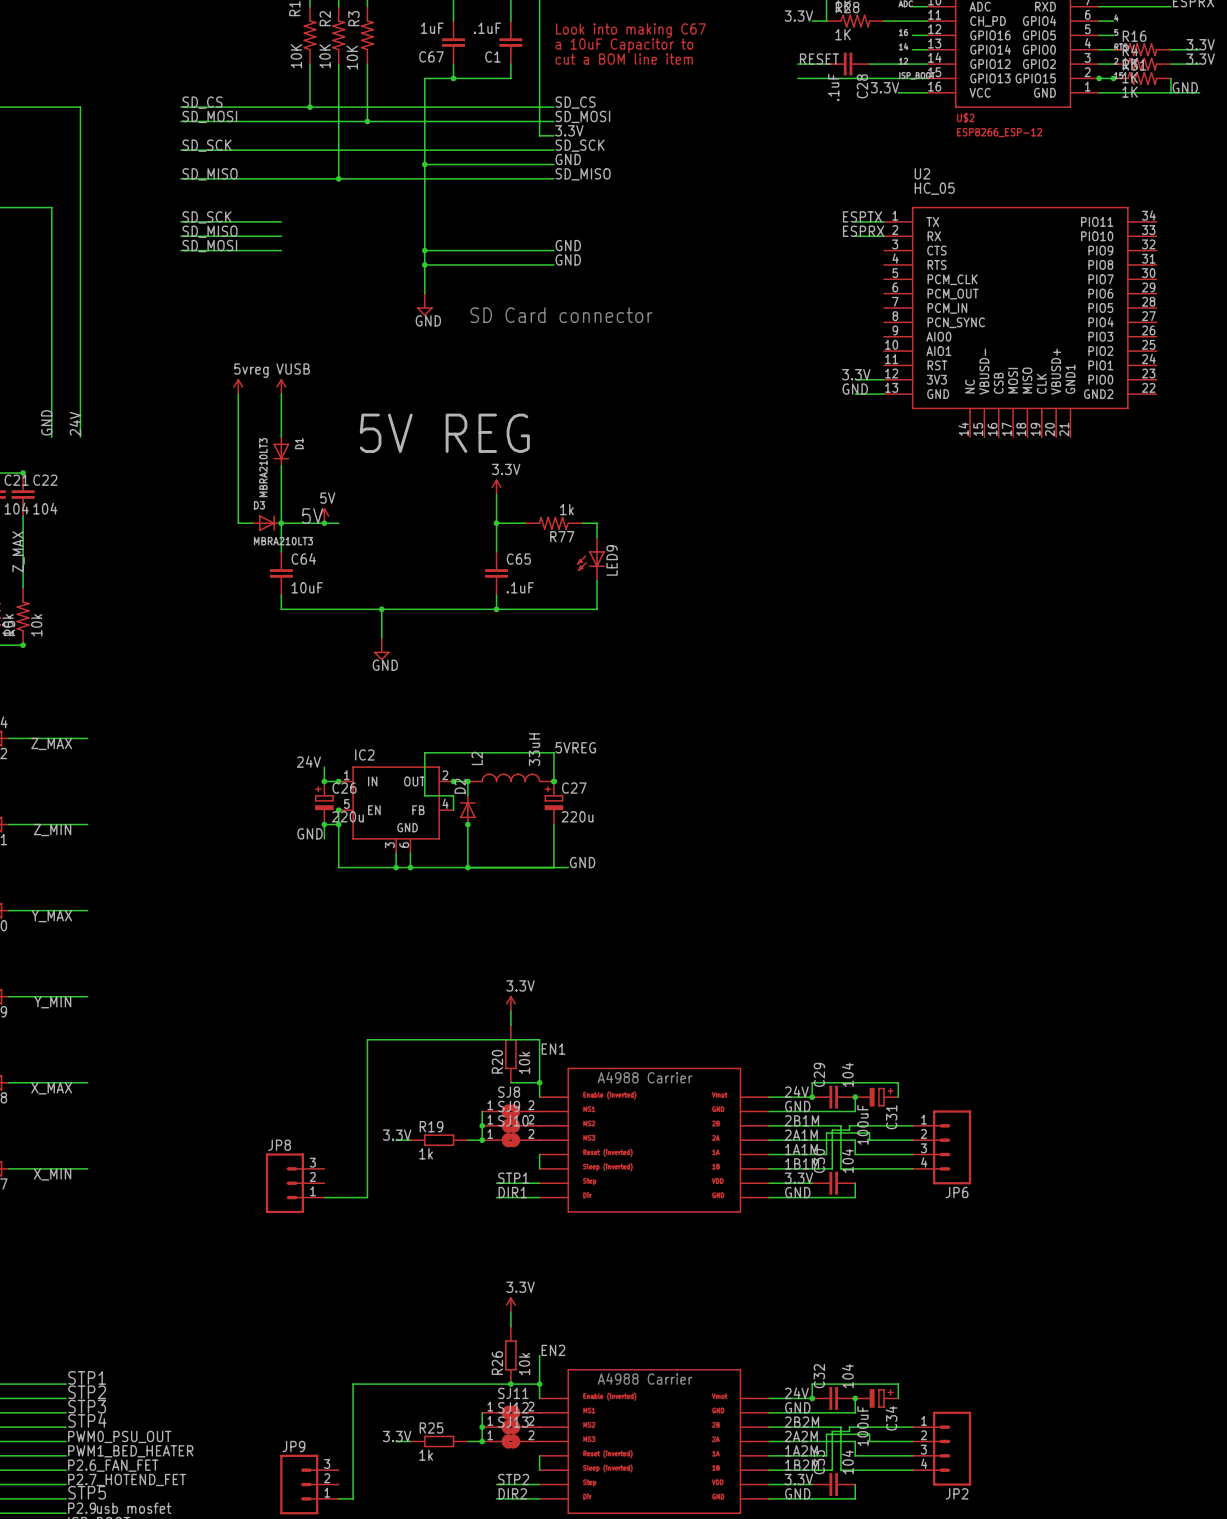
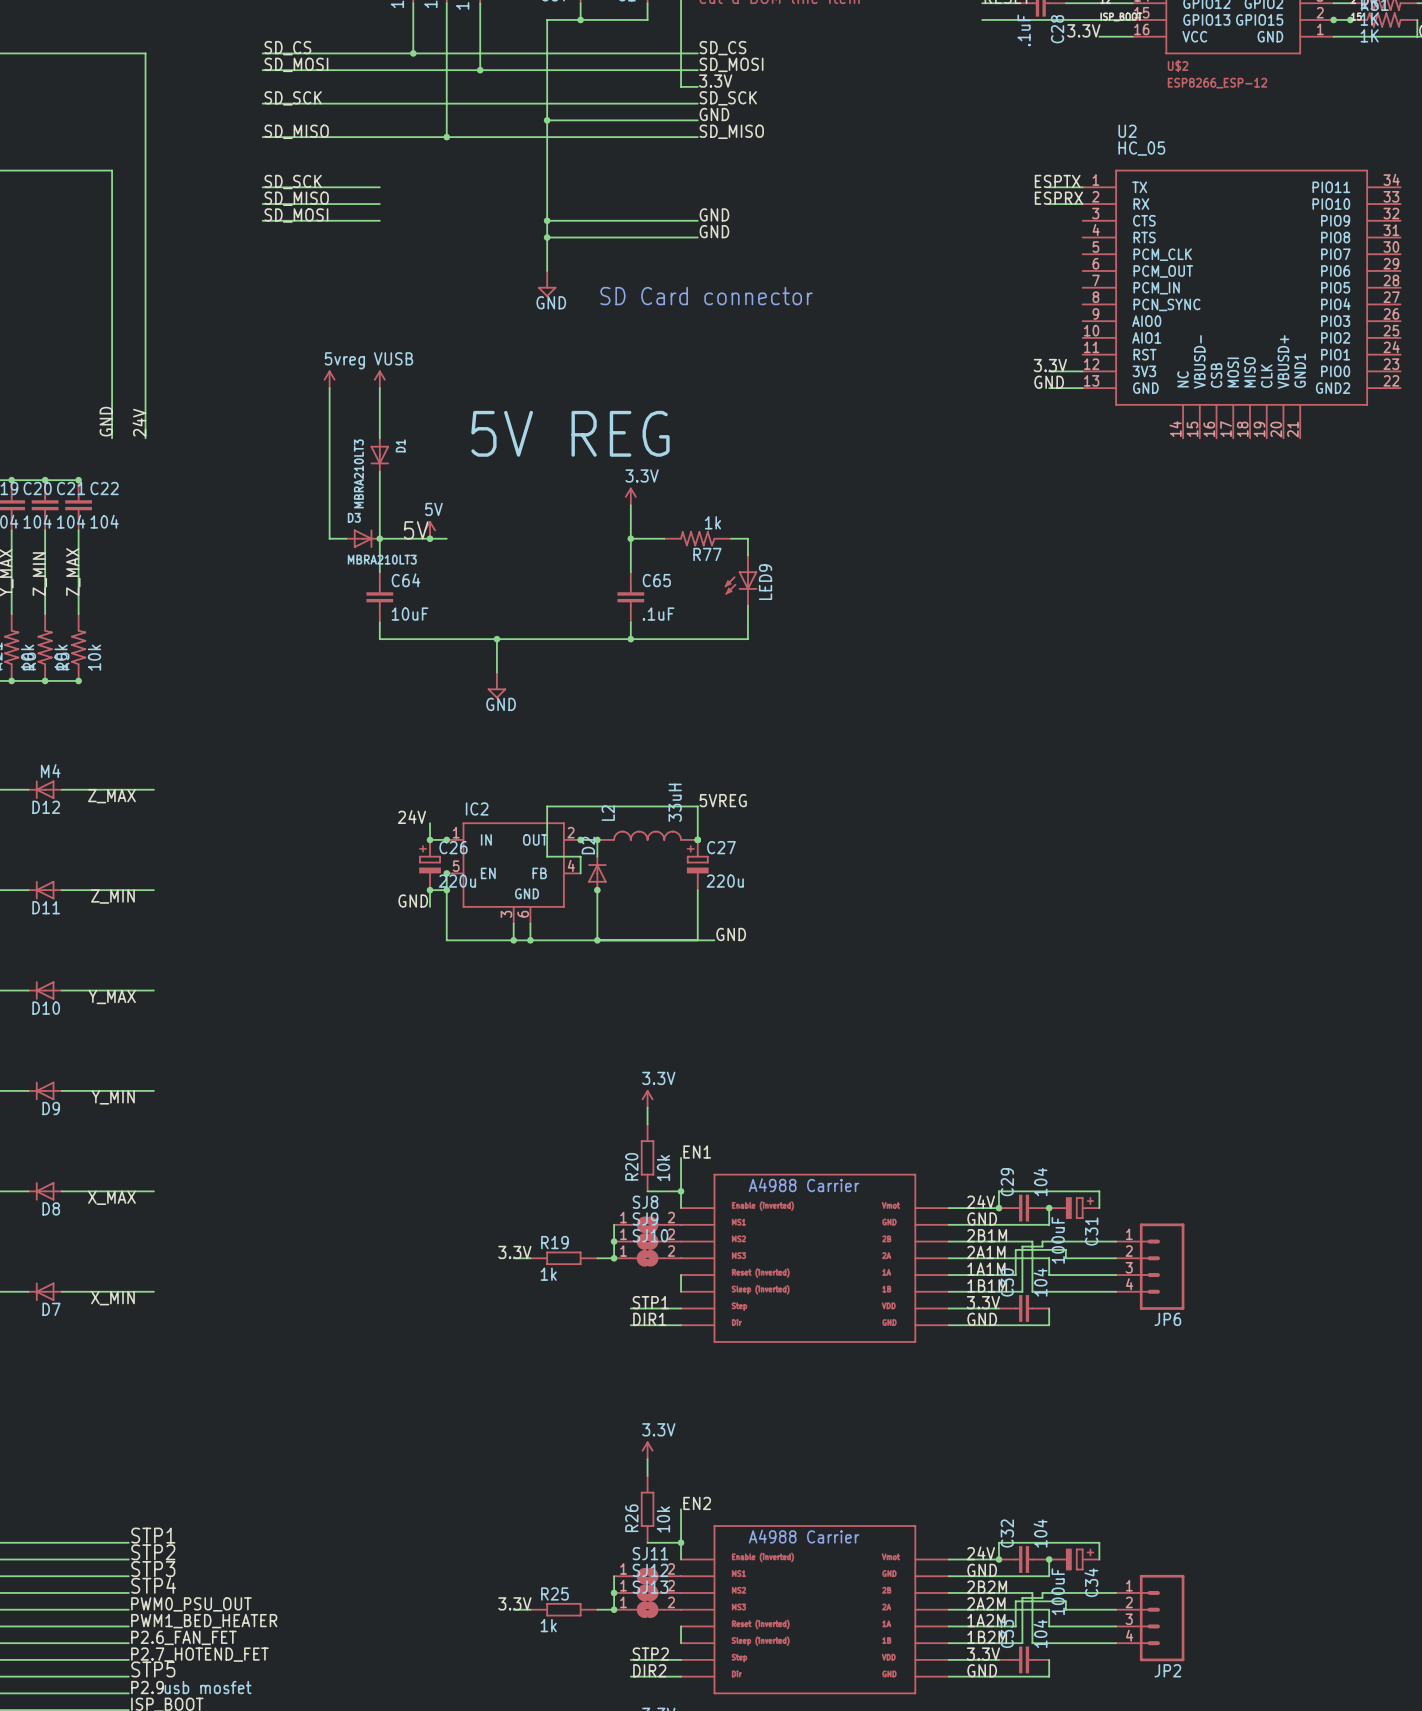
wire: (539, 1054) (539, 1039) (367, 1039) (367, 1197) (324, 1197) -> none
JP8: (295, 1183) -> none
wire: (510, 1384) (353, 1384) (353, 1498) (338, 1498) -> none
junction: (510, 1384) -> none
JP9: (309, 1484) -> none

